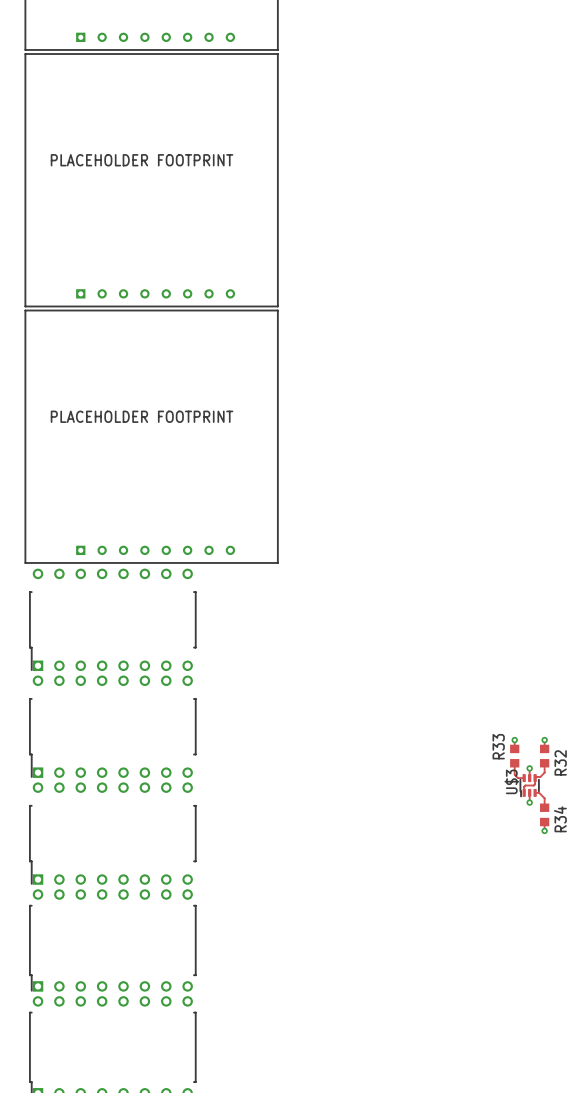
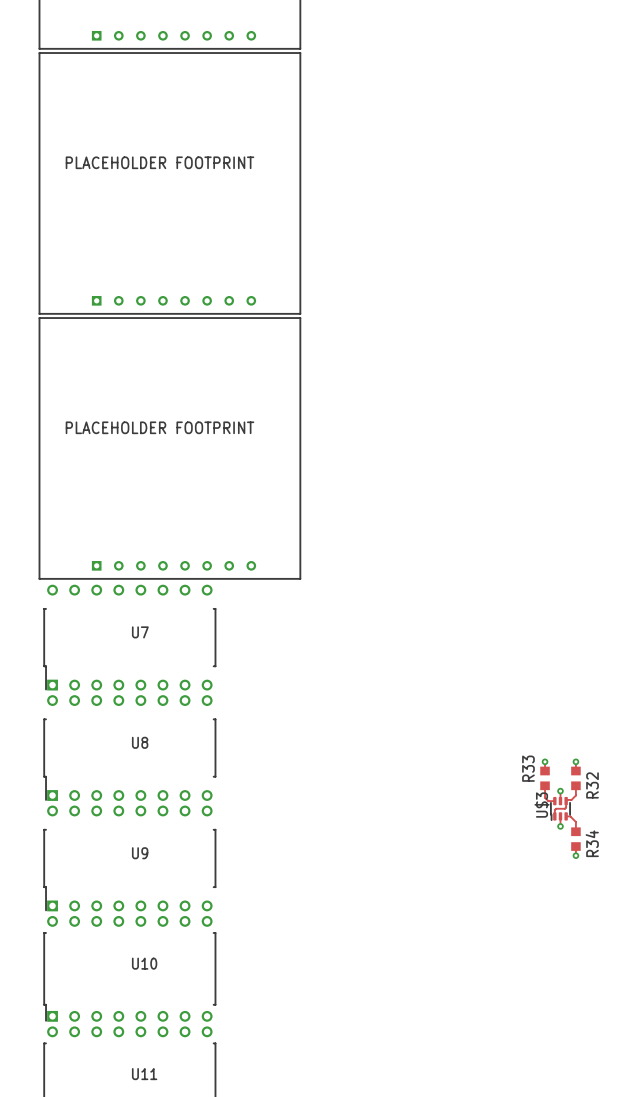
U7 name: none -> U7 (140, 632)
U8 name: none -> U8 (140, 742)
U9 name: none -> U9 (140, 853)
U10 name: none -> U10 (144, 963)
U11 name: none -> U11 (144, 1074)

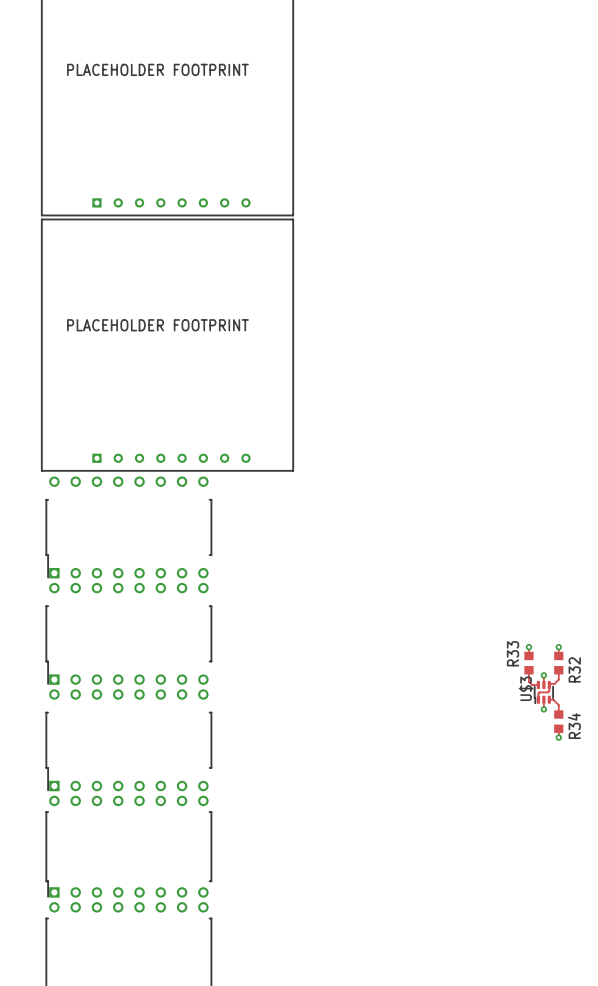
U7 name: U7 (140, 632) -> none
U8 name: U8 (140, 742) -> none
U9 name: U9 (140, 853) -> none
U10 name: U10 (144, 963) -> none
U11 name: U11 (144, 1074) -> none

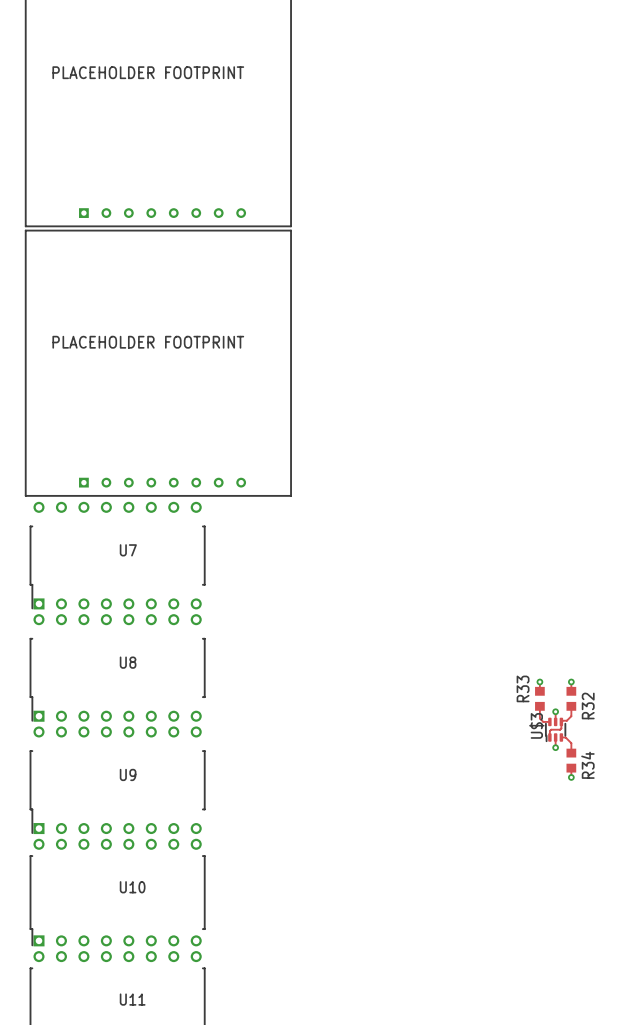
U7 name: none -> U7 (128, 550)
U8 name: none -> U8 (128, 662)
U9 name: none -> U9 (128, 774)
U10 name: none -> U10 (132, 887)
U11 name: none -> U11 (132, 999)

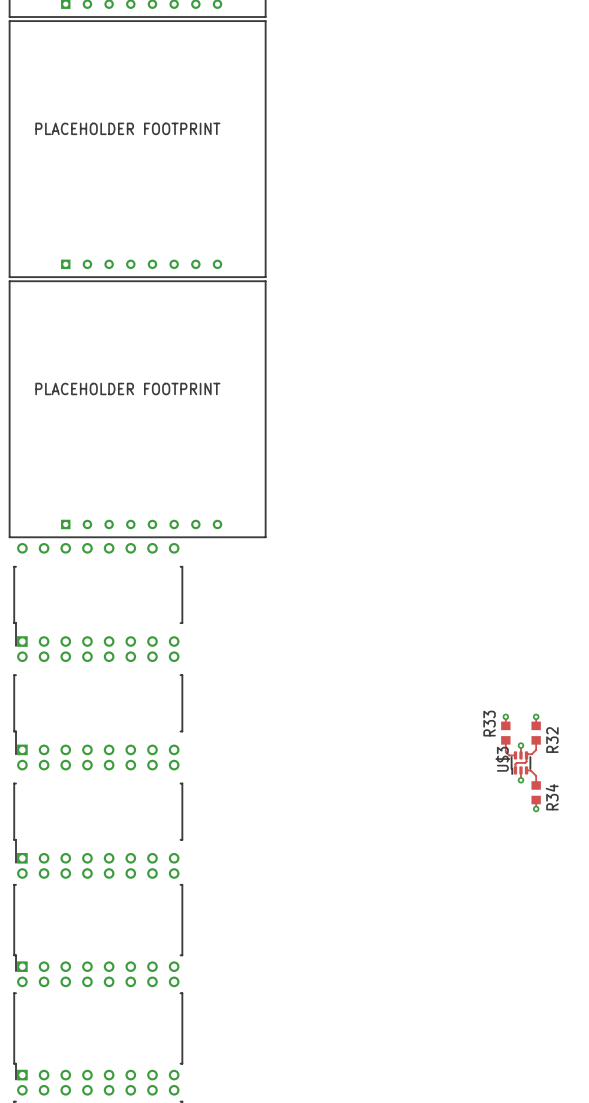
U7 name: U7 (128, 550) -> none
U8 name: U8 (128, 662) -> none
U9 name: U9 (128, 774) -> none
U10 name: U10 (132, 887) -> none
U11 name: U11 (132, 999) -> none

